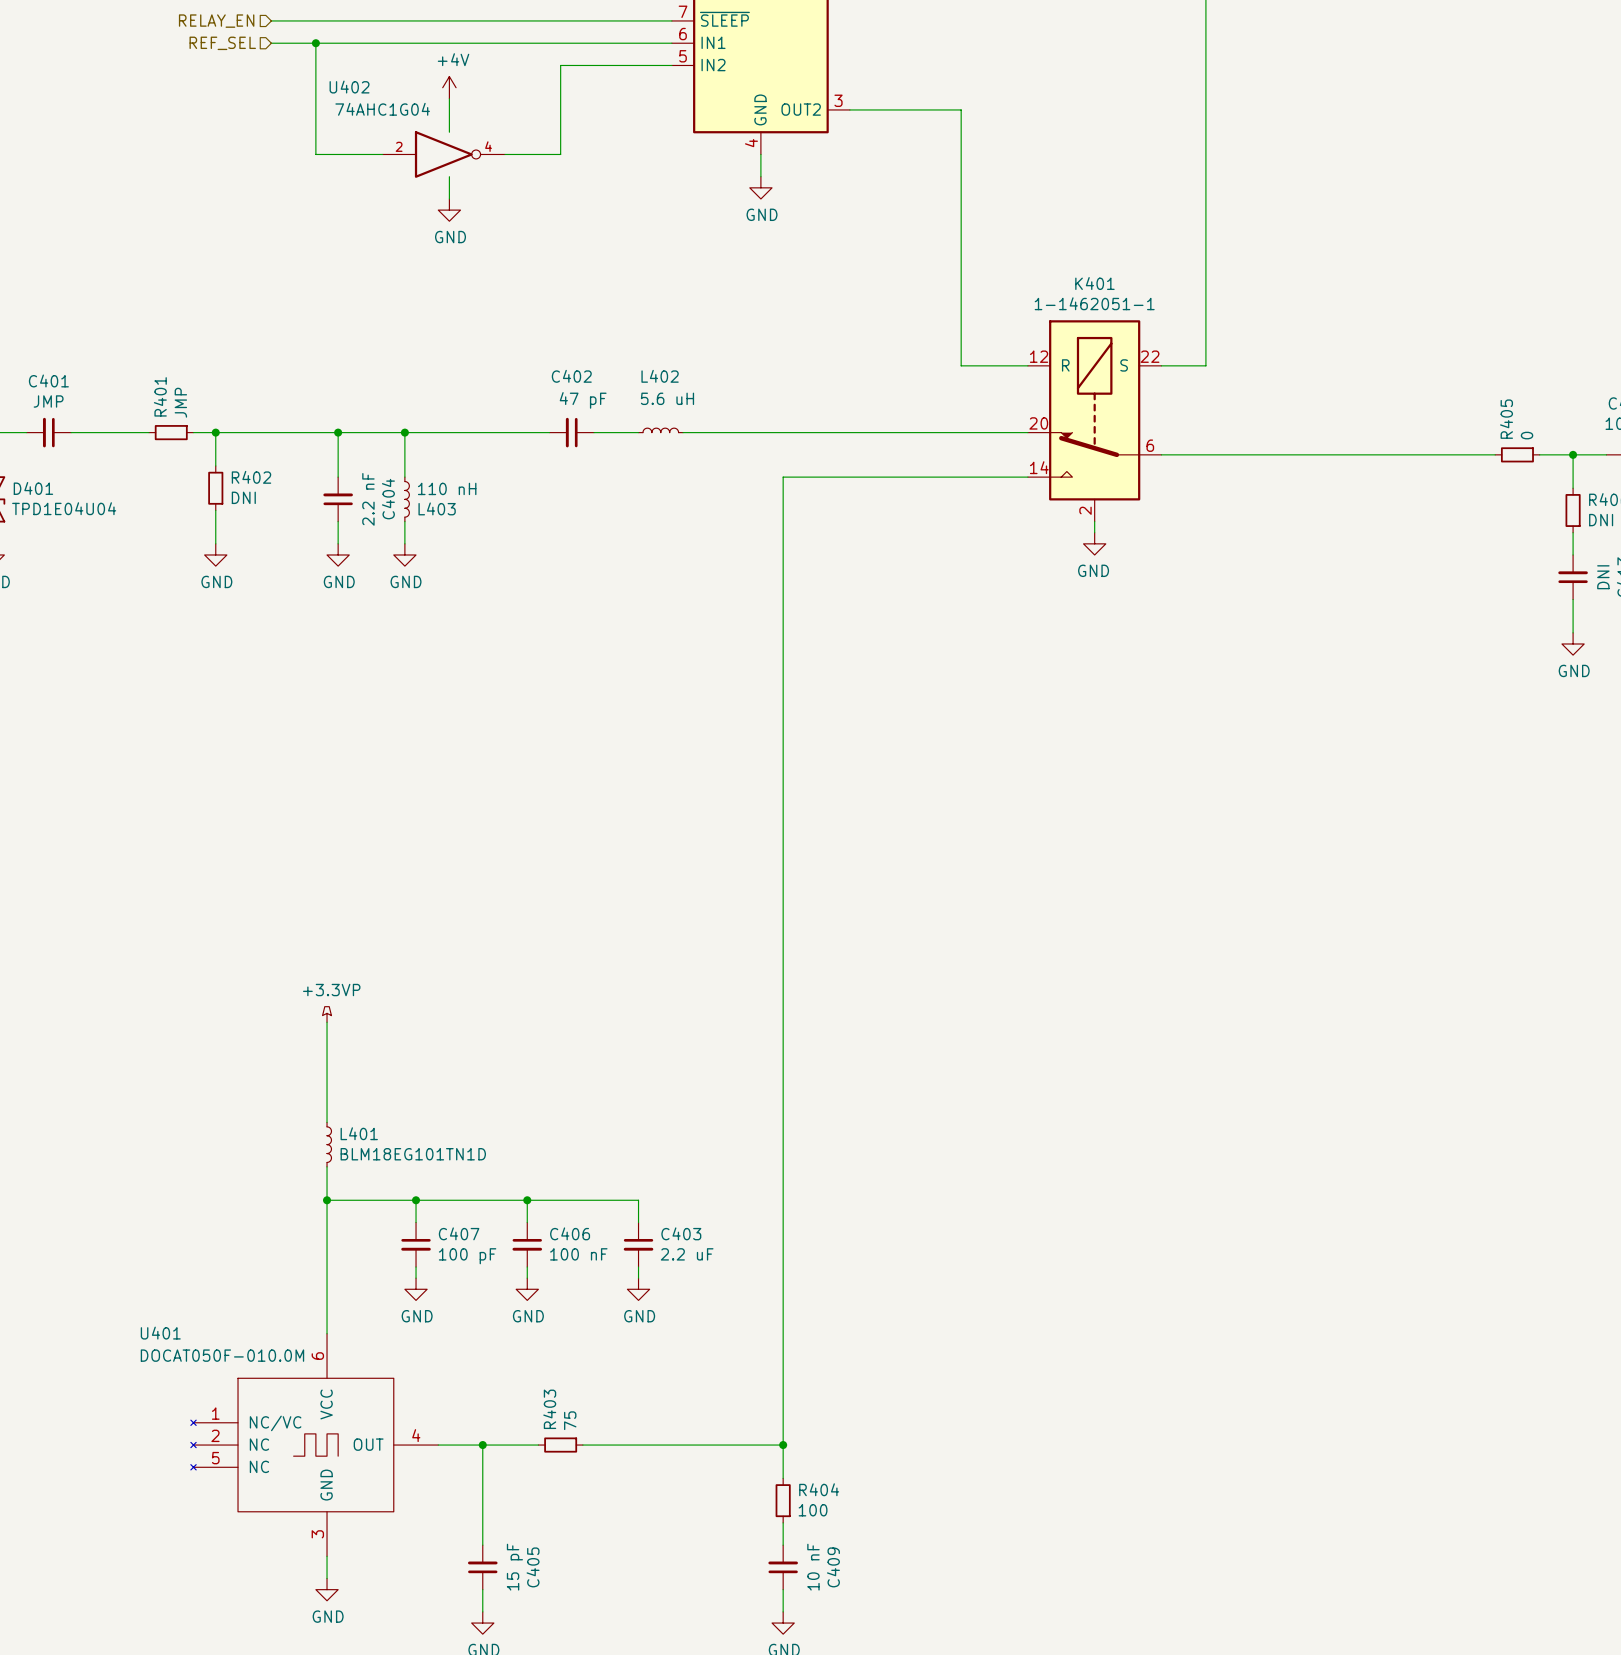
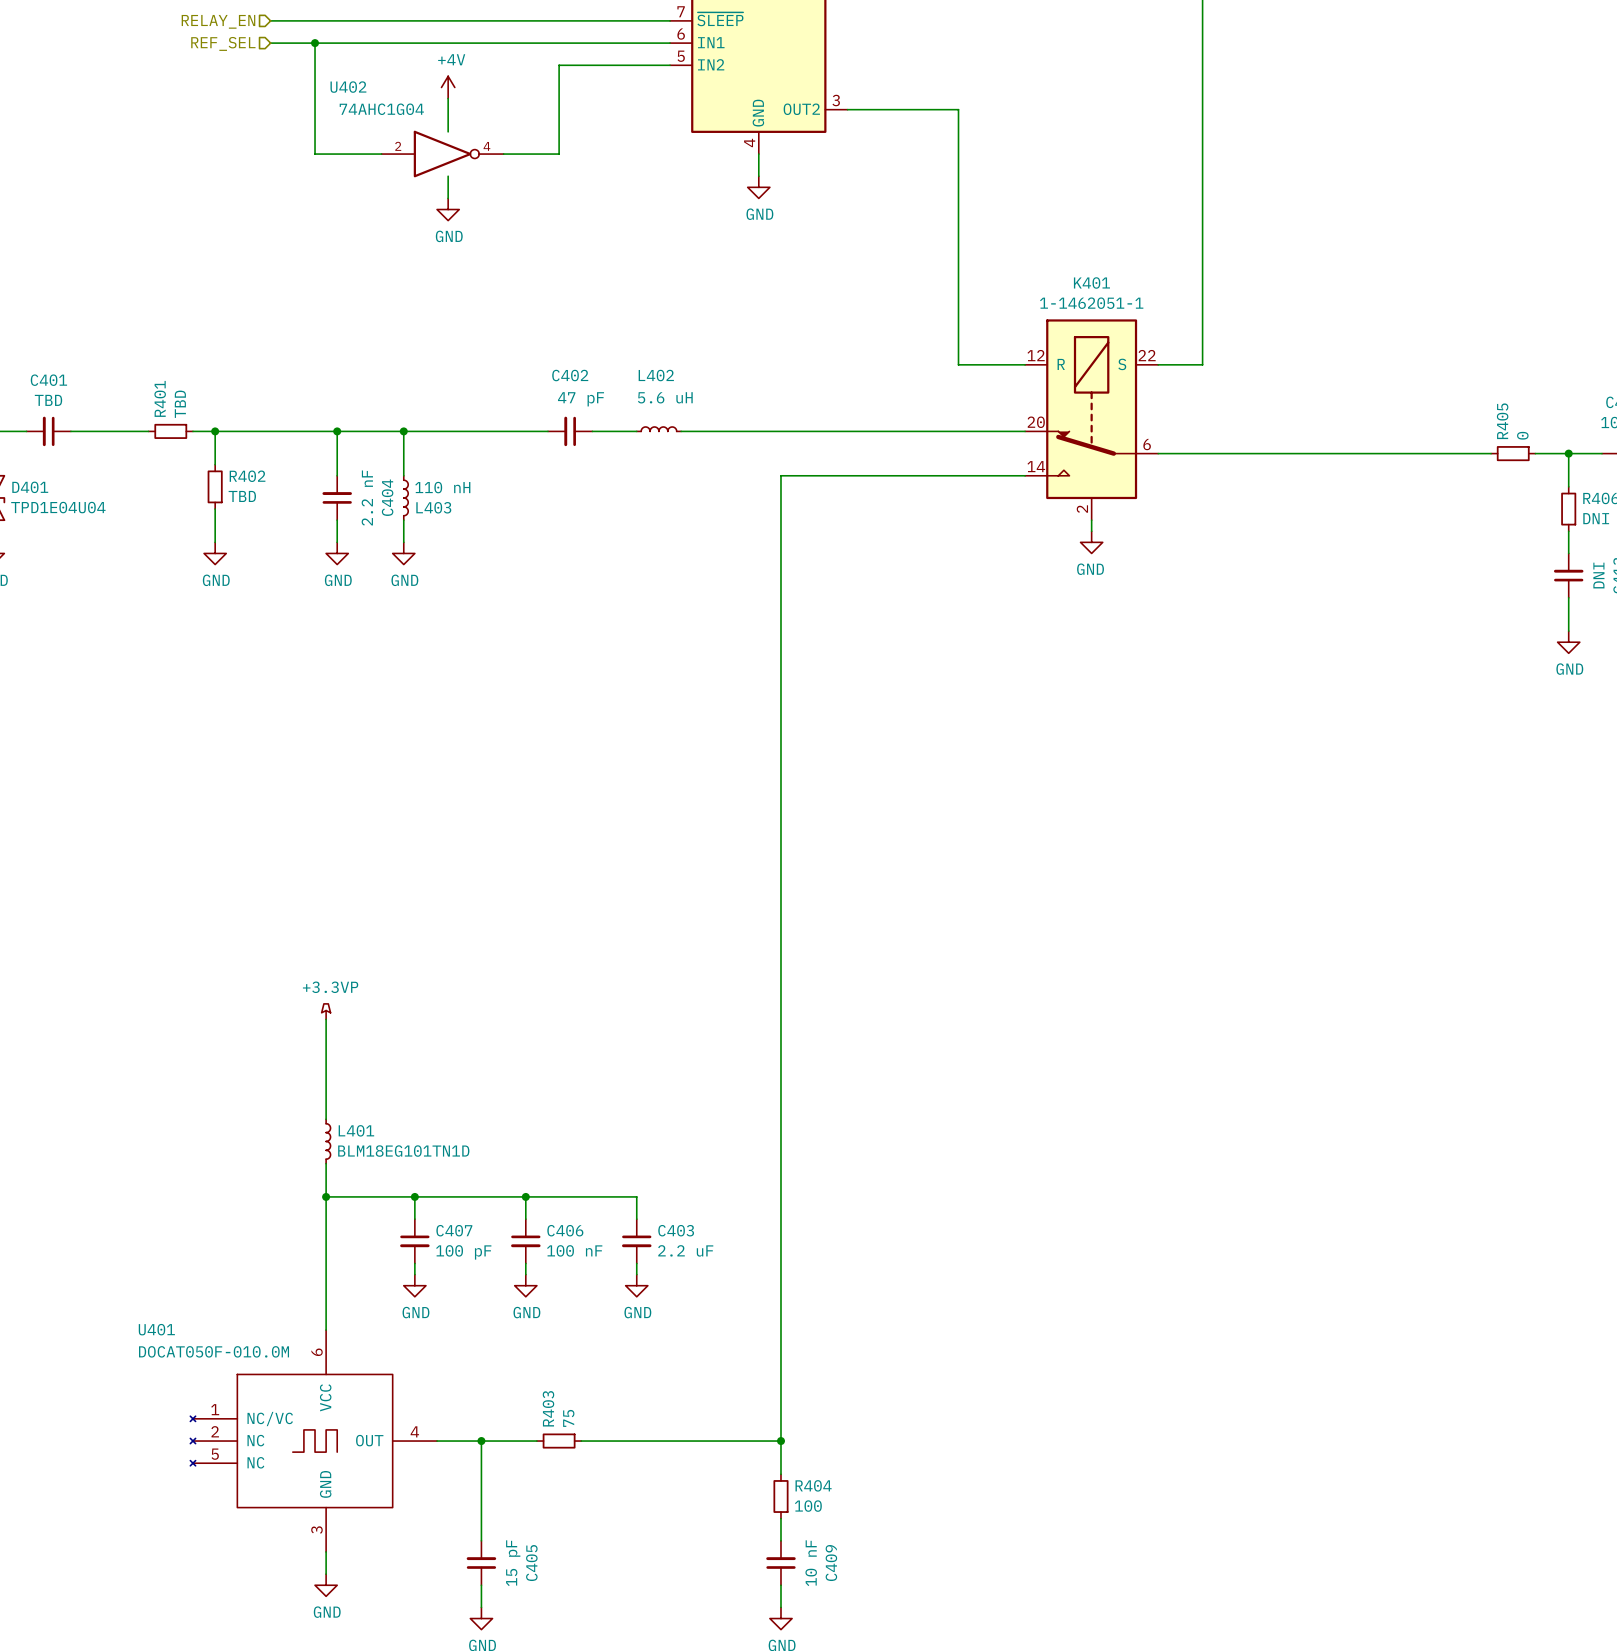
C401 value: JMP (48, 401) -> TBD (48, 400)
R401 value: JMP (180, 402) -> TBD (180, 404)
R402 value: DNI (243, 497) -> TBD (242, 496)

